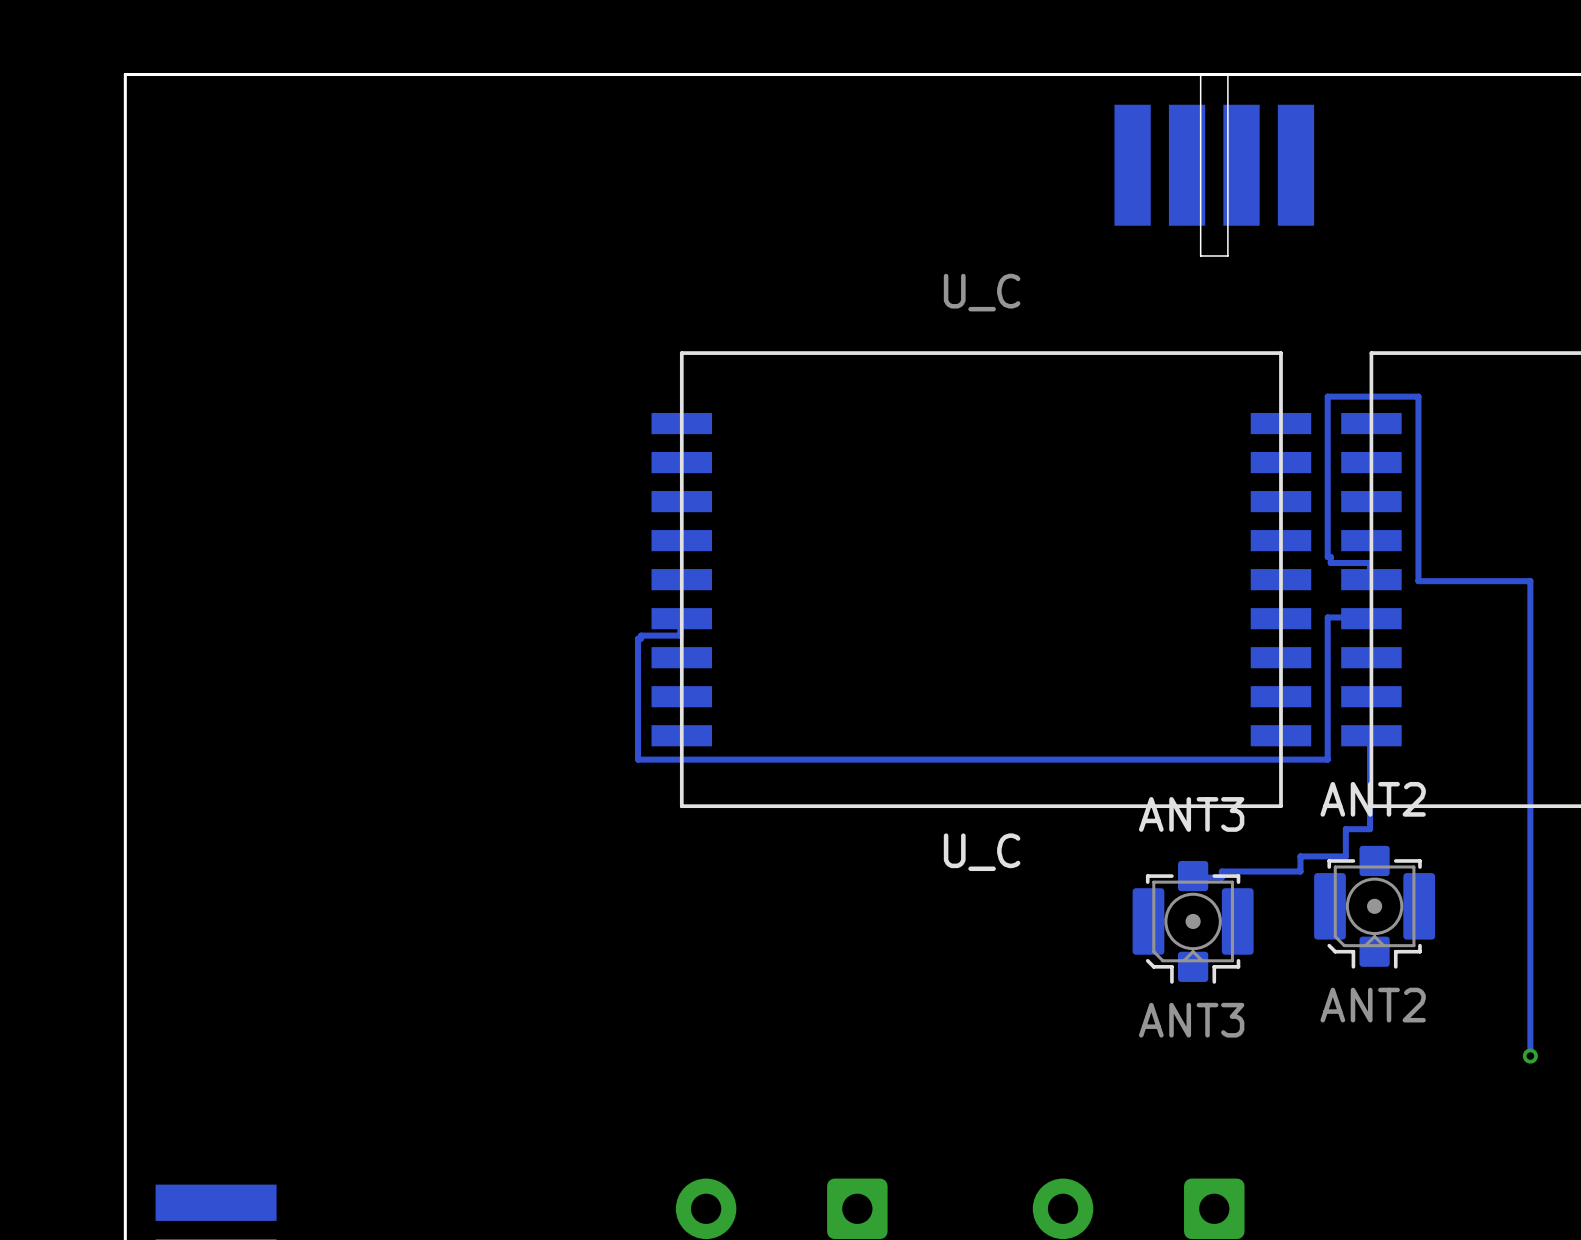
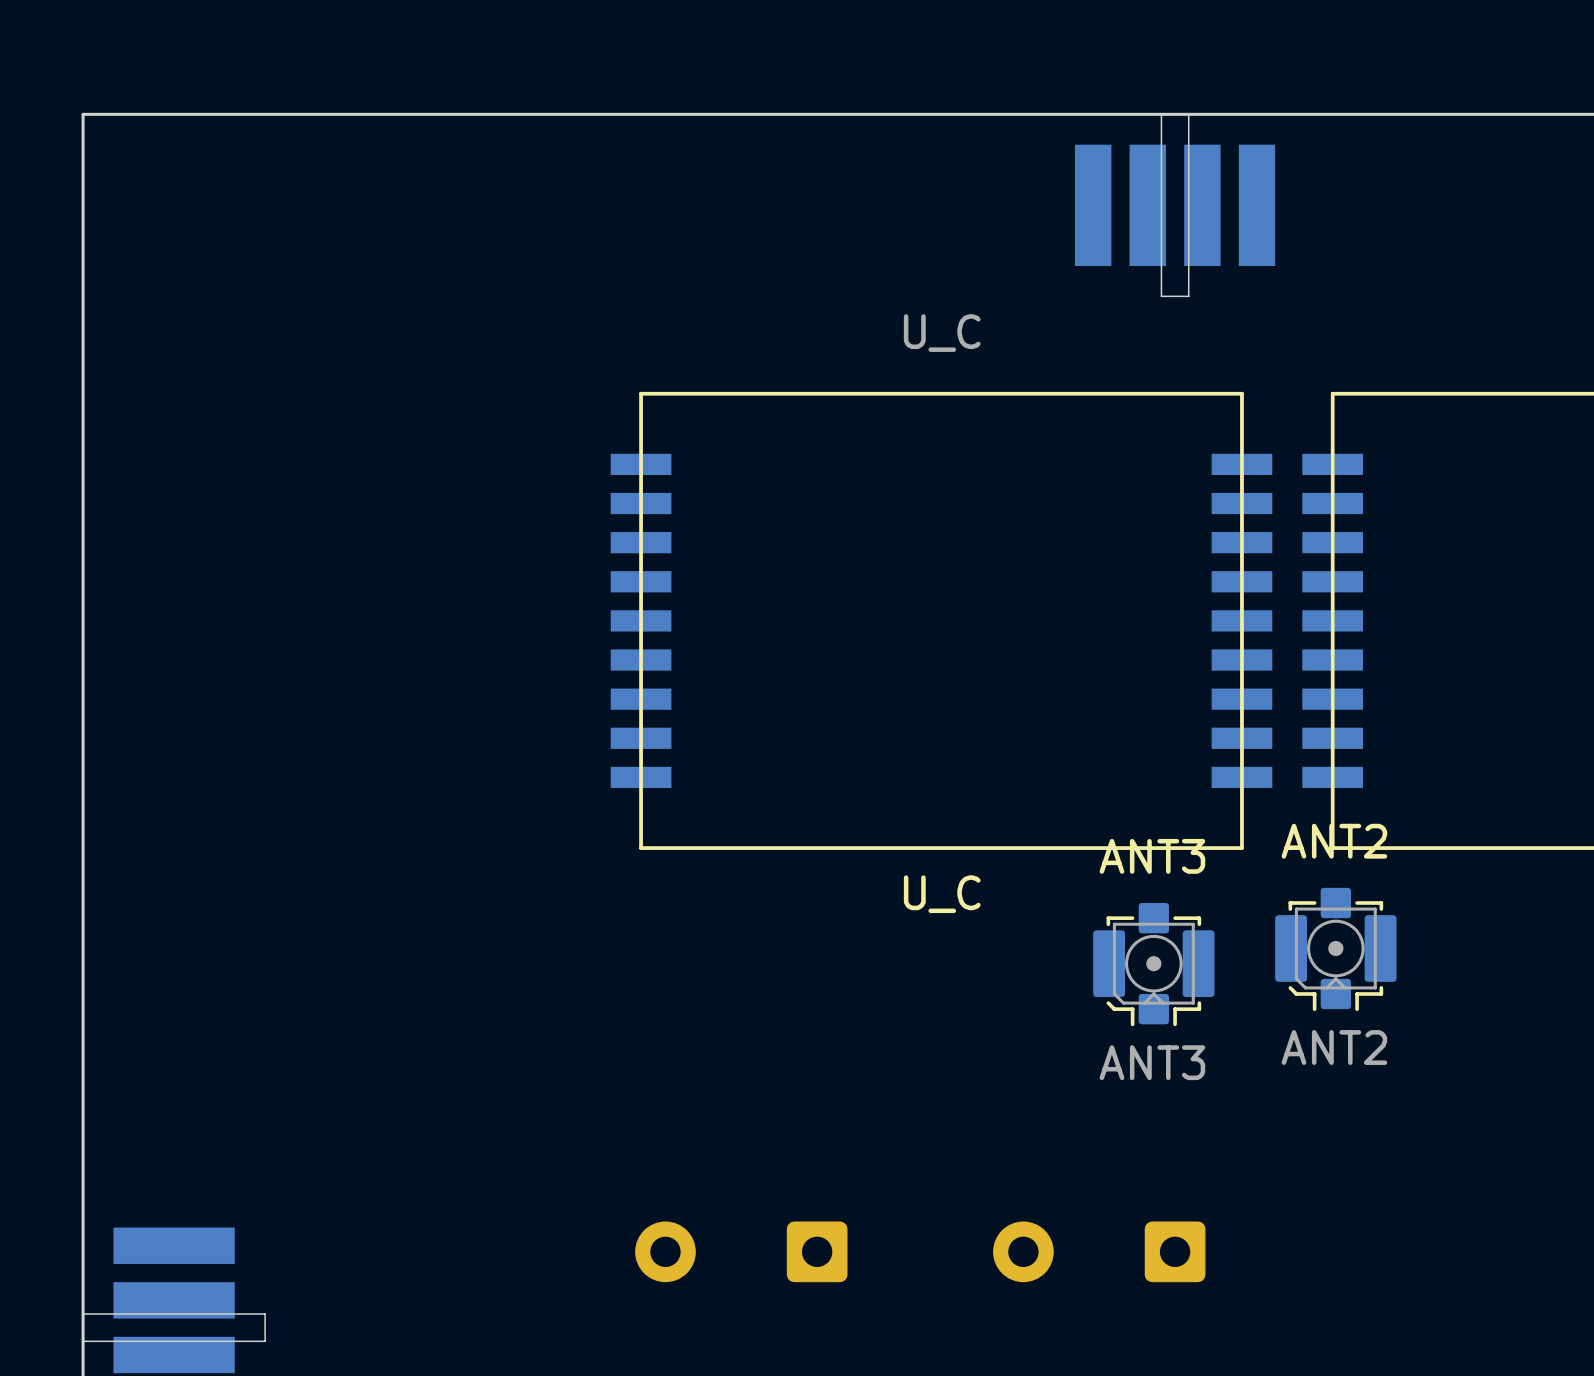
track: (1370, 581) (1370, 563) (1330, 563) (1330, 556) (1327, 556) (1327, 396) (1418, 396) (1418, 581) (1530, 581) (1530, 1056) -> none
track: (1370, 617) (1327, 617) (1327, 759) (638, 759) (638, 638) (641, 638) (641, 635) (680, 635) (680, 617) -> none
track: (1370, 735) (1370, 829) (1345, 829) (1345, 856) (1300, 856) (1300, 871) (1221, 871) (1221, 877) (1191, 877) -> none
via: (1530, 1056) -> none

